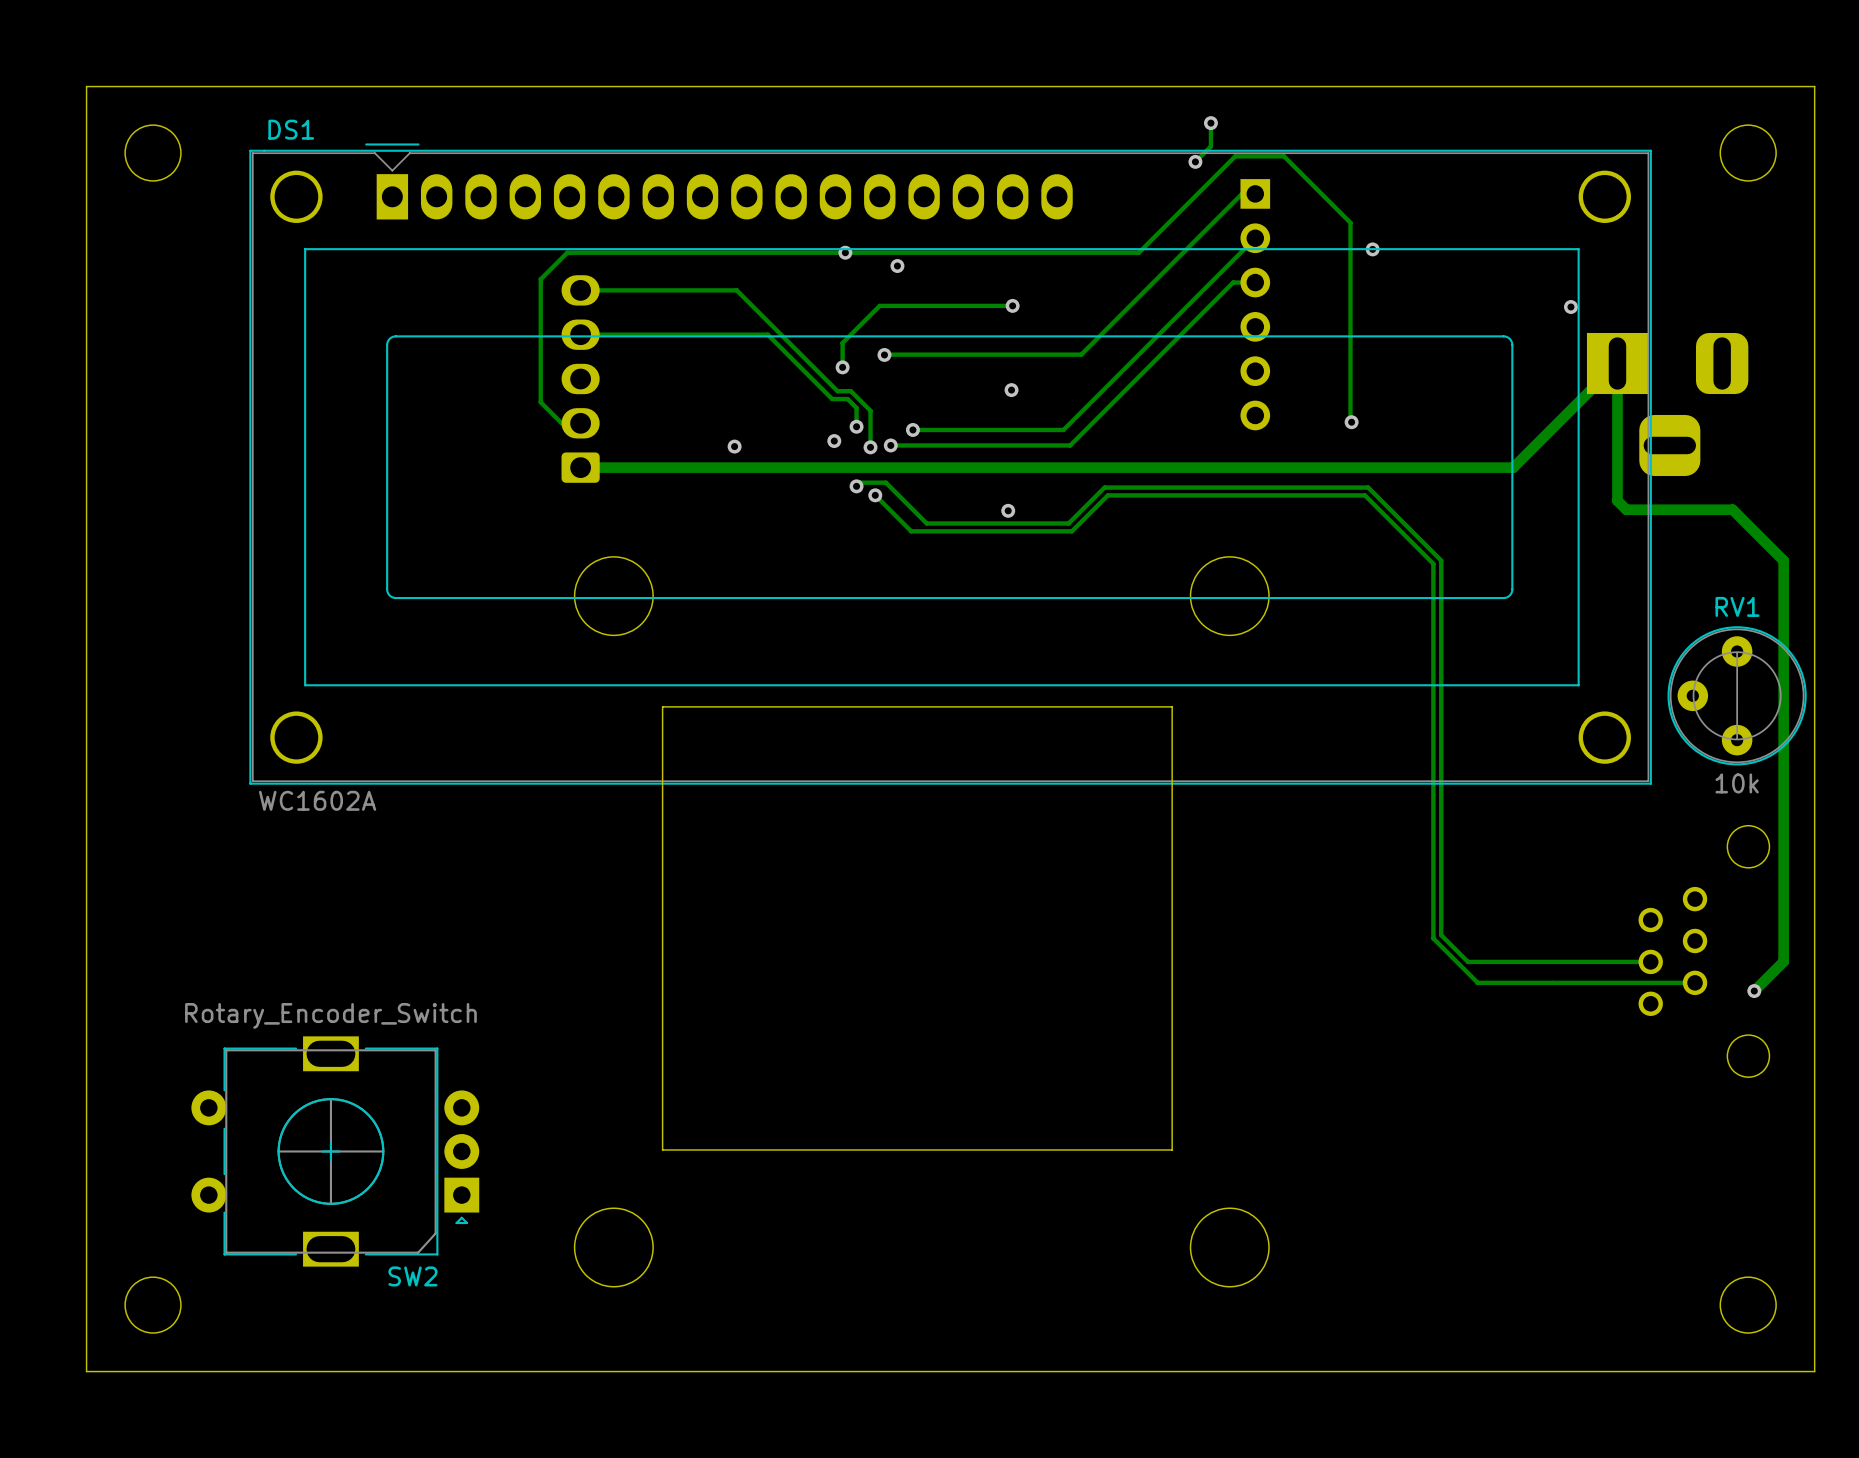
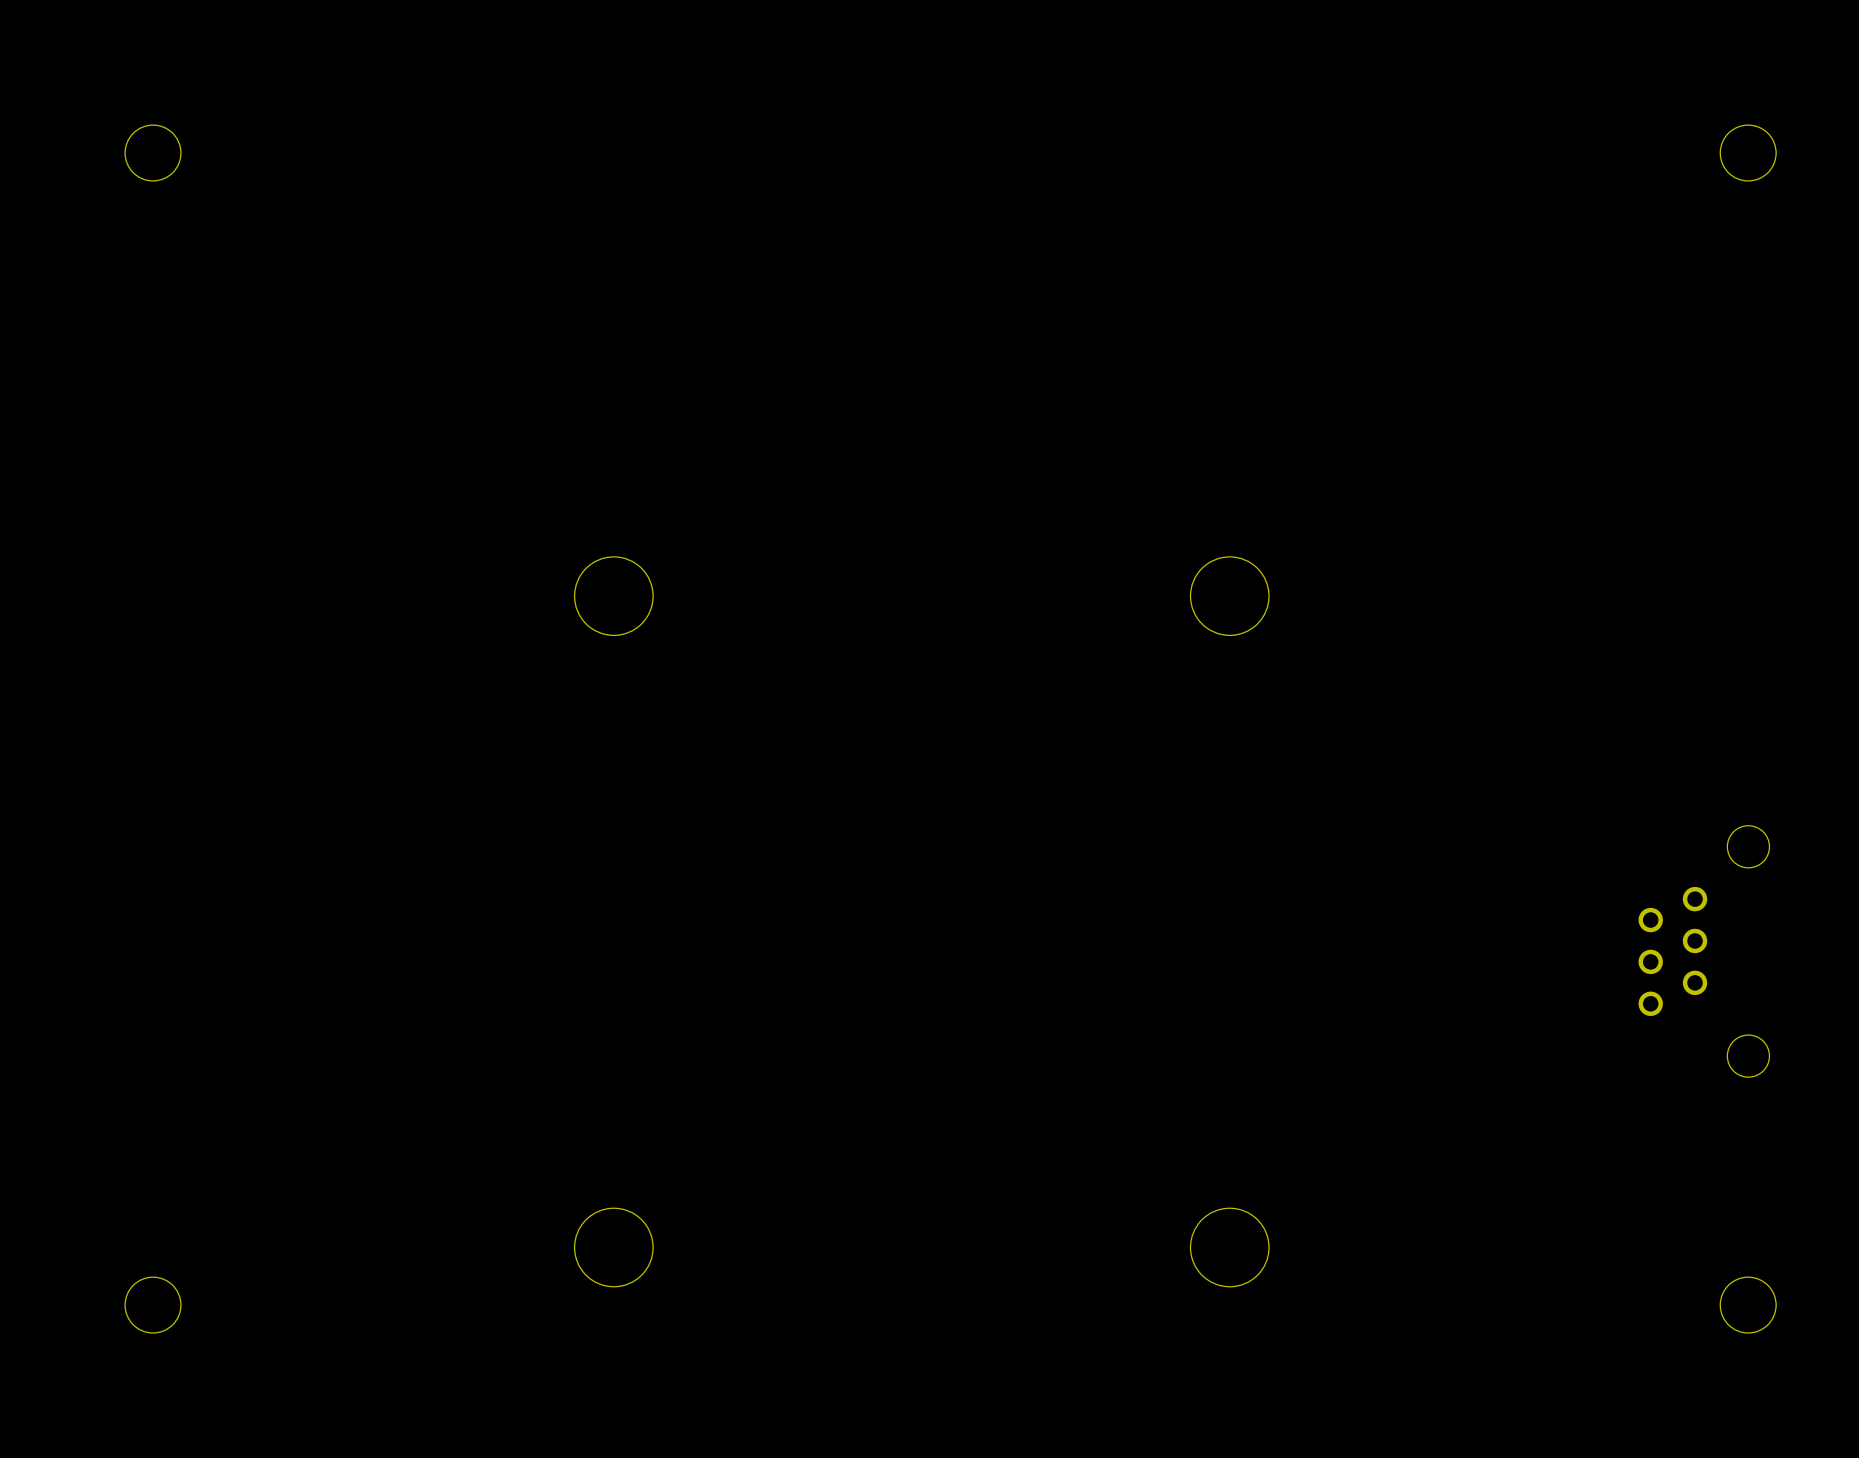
board edge: (1814, 86) (1814, 1371) (86, 1371) (86, 86) (1814, 86) -> none
track: (1210, 123) (1210, 146) (1195, 161) -> none
via: (1210, 123) -> none
via: (1195, 161) -> none
track: (1255, 193) (1242, 193) (1081, 354) (884, 354) -> none
track: (1255, 238) (1063, 429) (912, 429) -> none
via: (1372, 249) -> none
via: (845, 252) -> none
via: (897, 266) -> none
track: (1255, 282) (1233, 282) (1070, 445) (890, 445) -> none
track: (580, 290) (736, 290) (837, 391) (850, 391) (870, 410) (870, 447) -> none
part: (1255, 304) -> none
track: (1012, 305) (879, 305) (842, 343) (842, 367) -> none
via: (1012, 305) -> none
via: (1570, 307) -> none
track: (580, 334) (767, 334) (832, 399) (847, 399) (856, 407) (856, 426) -> none
via: (884, 354) -> none
via: (842, 367) -> none
part: (580, 379) -> none
via: (1011, 390) -> none
part: (1667, 404) -> none
track: (1351, 422) (1350, 222) (1284, 156) (1235, 156) (1138, 252) (567, 252) (540, 279) (540, 402) (561, 423) (580, 423) -> none
via: (1351, 422) -> none
via: (856, 426) -> none
via: (912, 429) -> none
via: (834, 441) -> none
via: (890, 445) -> none
via: (734, 446) -> none
via: (870, 447) -> none
DS1: WC1602A (950, 464) -> none
track: (580, 467) (1513, 467) (1617, 363) (1617, 500) (1626, 509) (1732, 509) (1783, 560) (1783, 961) (1754, 991) -> none
track: (856, 486) (860, 482) (885, 482) (926, 523) (1068, 523) (1104, 487) (1368, 487) (1441, 560) (1441, 935) (1467, 961) (1650, 961) -> none
via: (856, 486) -> none
track: (875, 495) (911, 531) (1071, 531) (1107, 495) (1364, 495) (1433, 563) (1433, 938) (1477, 982) (1695, 982) -> none
via: (875, 495) -> none
via: (1008, 510) -> none
RV1: 10k (1737, 695) -> none
board edge: (1172, 706) (662, 706) (662, 1150) (1172, 1150) (1172, 706) -> none
via: (1754, 991) -> none
SW2: Rotary_Encoder_Switch (335, 1151) -> none

